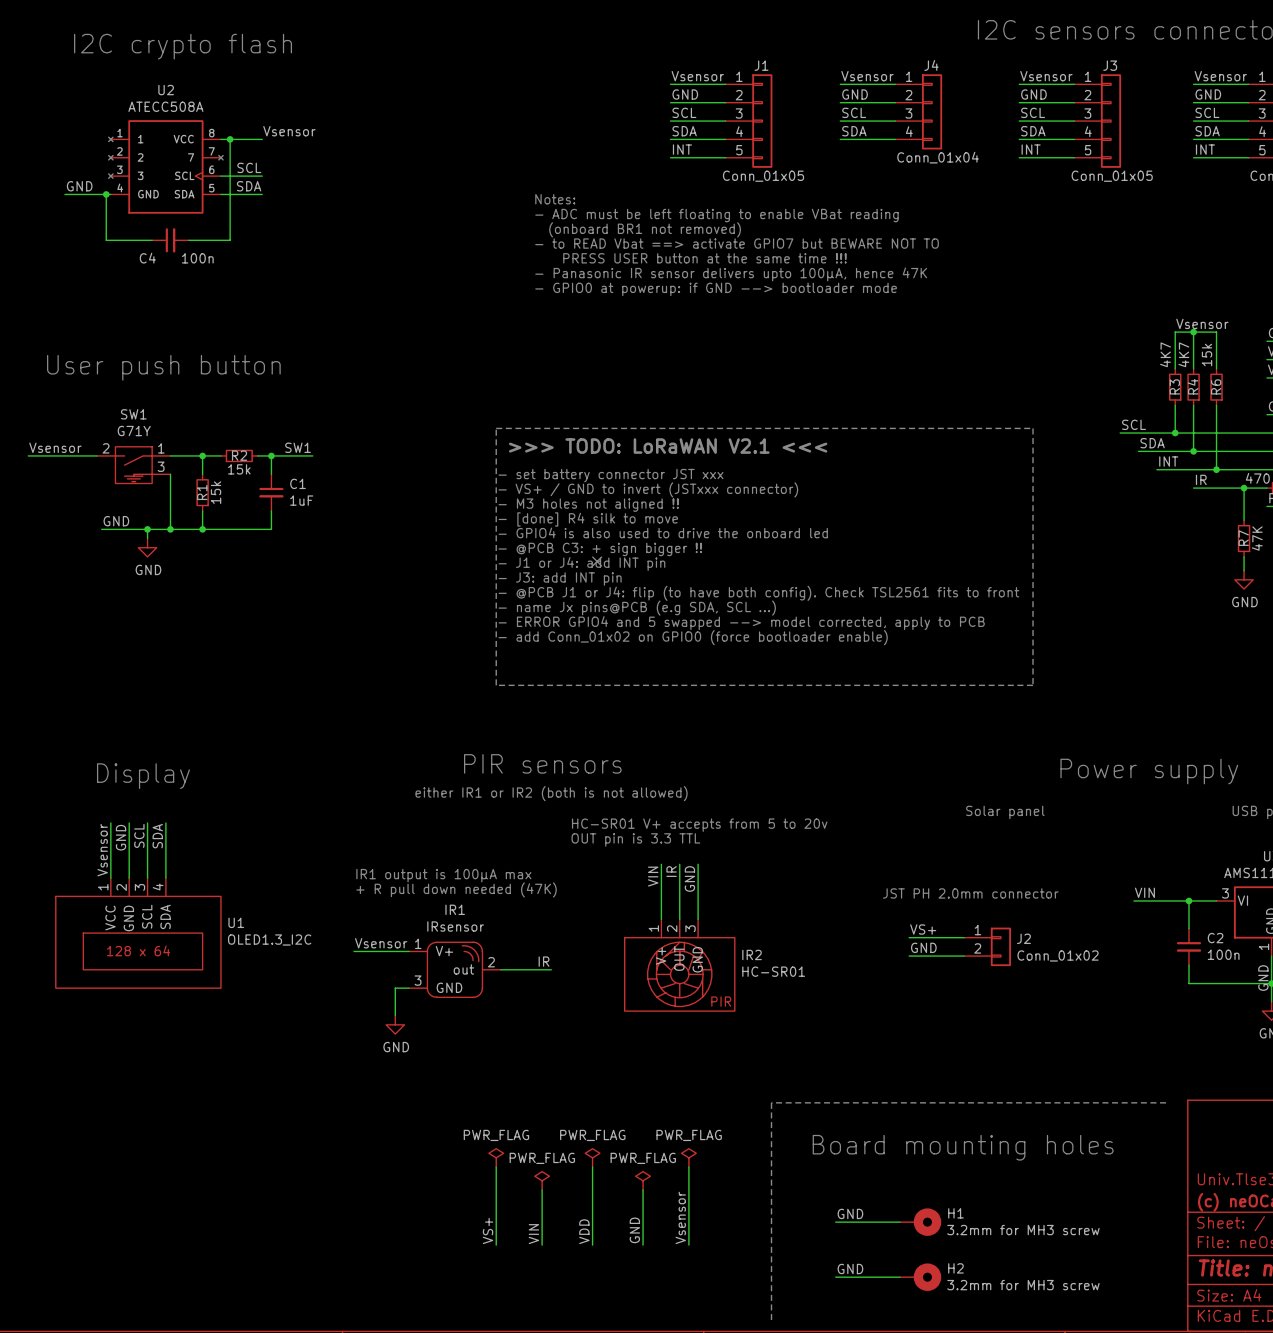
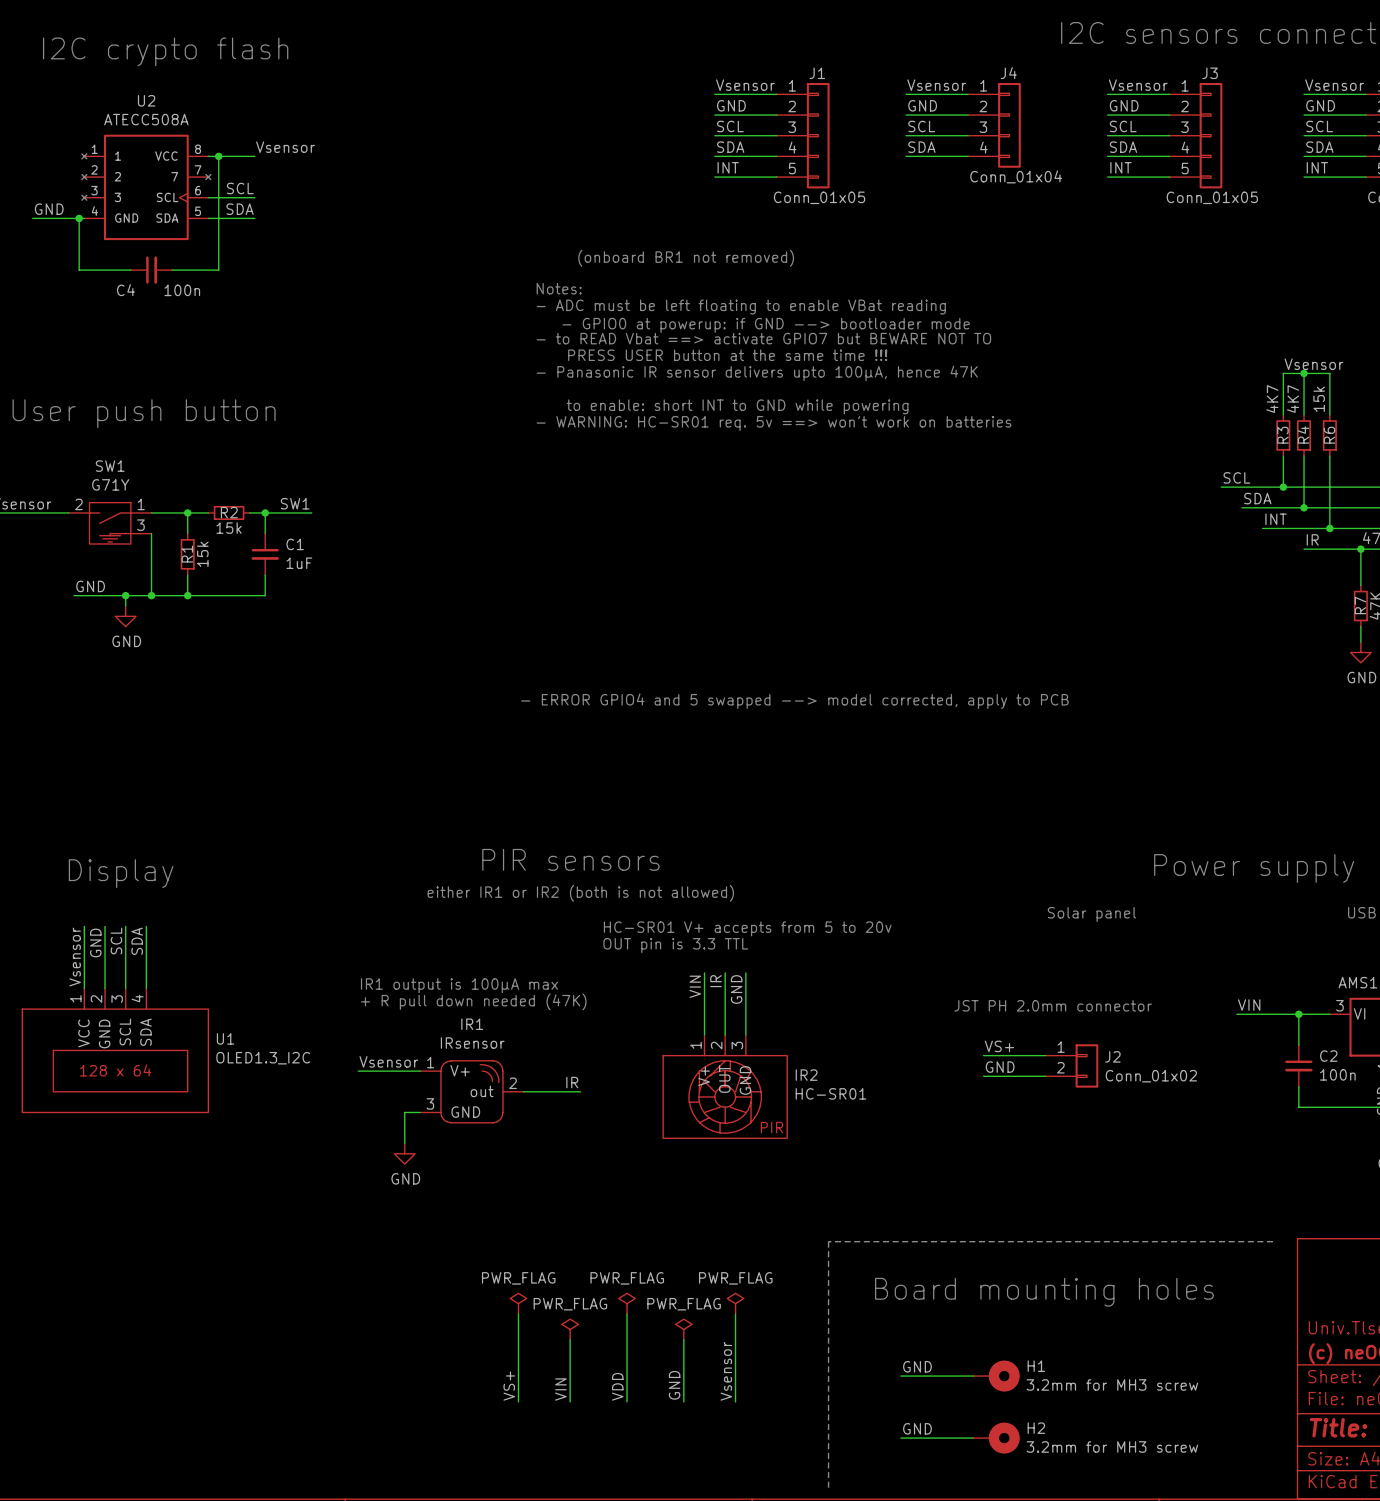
text position: Notes: (555, 199) -> Notes: (559, 288)
text position: - ADC must be left floating to enable VBat reading (716, 215) -> - ADC must be left floating to enable VBat reading (741, 307)
text position: - to READ Vbat ==> activate GPIO7 but BEWARE NOT TO (737, 243) -> - to READ Vbat ==> activate GPIO7 but BEWARE NOT TO (763, 338)
text position: PRESS USER button at the same time !!! (704, 258) -> PRESS USER button at the same time !!! (727, 355)
text position: - Panasonic IR sensor delivers upto 100µA, hence 47K (731, 274) -> - Panasonic IR sensor delivers upto 100µA, hence 47K (757, 373)
text: none -> to enable: short INT to GND while powering (737, 406)
text: none -> - WARNING: HC-SR01 req. 5v ==> won't work on batteries (774, 423)
line: (496, 428) (1033, 428) (1033, 685) (496, 685) (496, 428) -> none
text: >>> TODO: LoRaWAN V2.1 <<< (668, 446) -> none
text: - set battery connector JST xxx (611, 475) -> none
text: - VS+ / GND to invert (JSTxxx connector) (648, 489) -> none
text: - M3 holes not aligned !! (588, 505) -> none
text: - [done] R4 silk to move (588, 519) -> none
text: - GPIO4 is also used to drive the onboard led (663, 532) -> none
text: - @PCB C3: + sign bigger !! (600, 549) -> none
no-connect mark: (597, 561) -> none
text: - J1 or J4: add INT pin (581, 563) -> none
text: - J3: add INT pin (560, 578) -> none
text: - @PCB J1 or J4: flip (to have both config). Check TSL2561 fits to front (758, 593) -> none
text: - name Jx pins@PCB (e.g SDA, SCL ...) (637, 608) -> none
text: - add Conn_01x02 on GPIO0 (force bootloader enable) (693, 637) -> none

